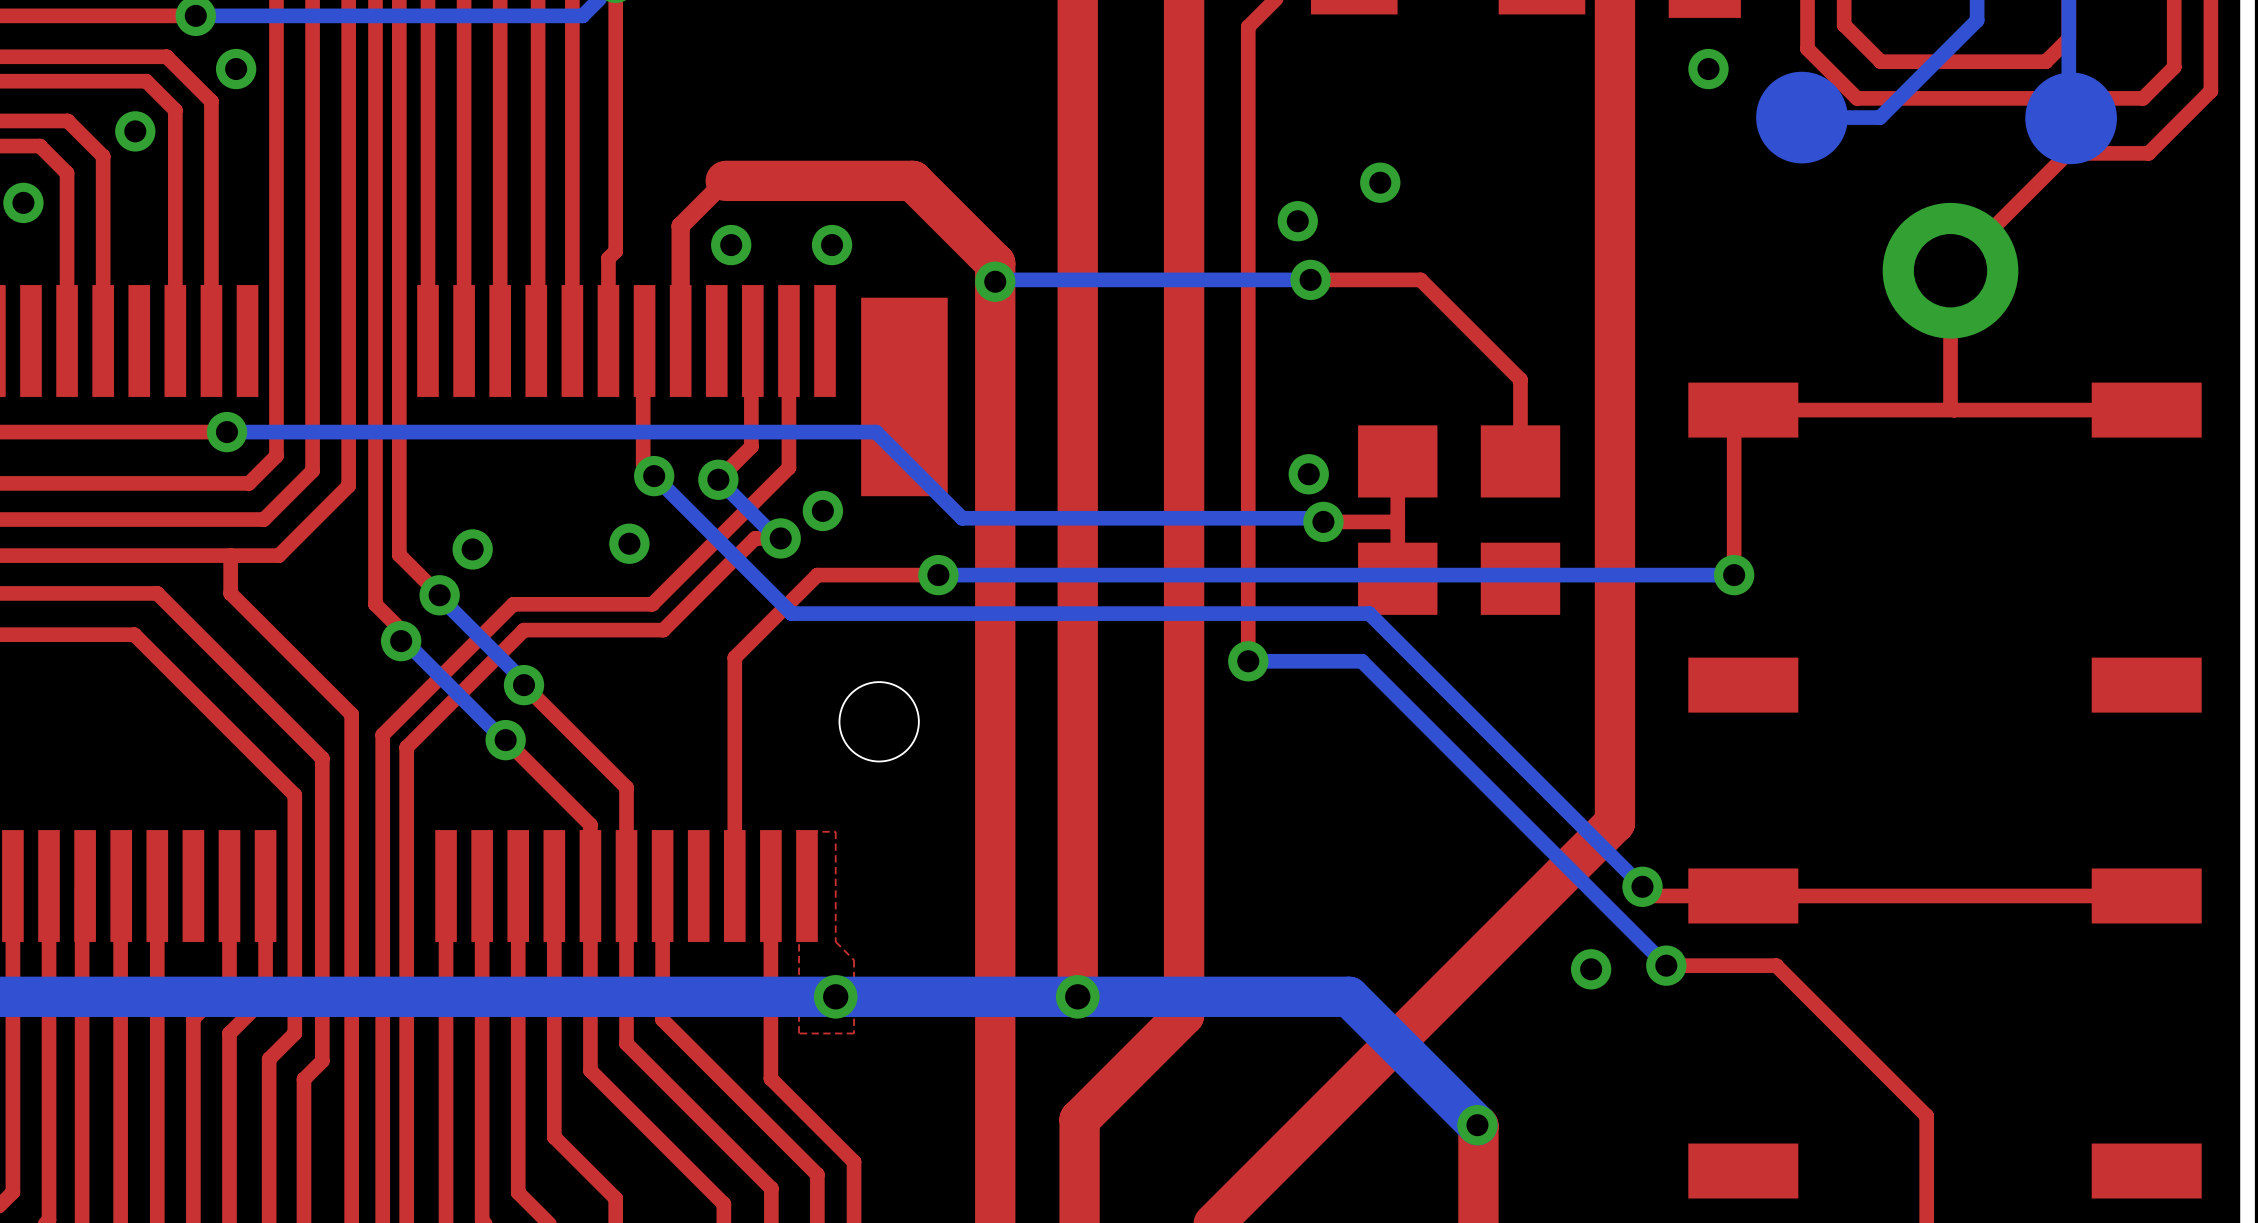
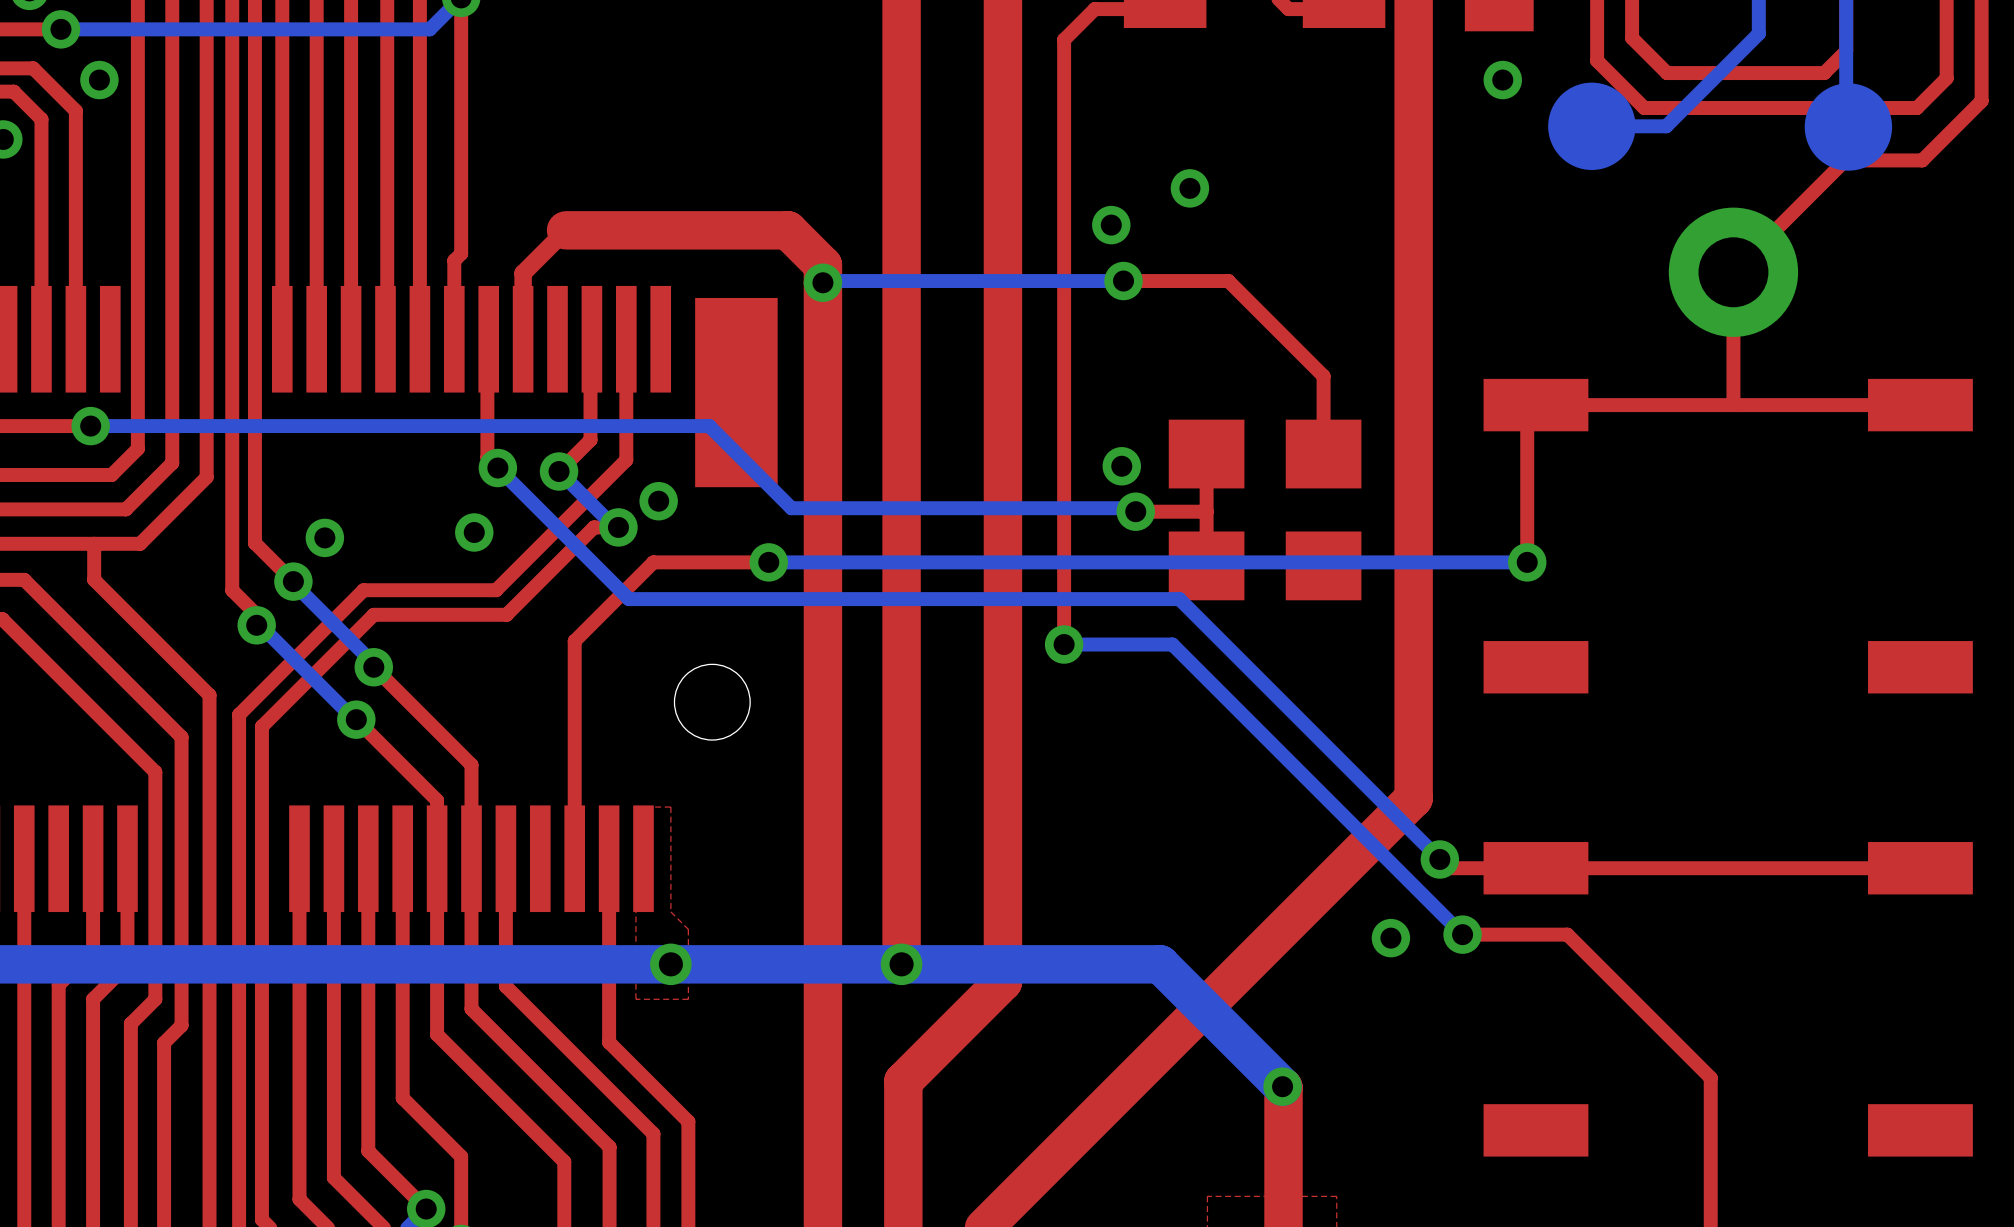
top track: (958, 226) (912, 180) (725, 180) (680, 225) (680, 271) -> (787, 230) (566, 230) (523, 273)
via: (731, 245) -> none
via: (832, 245) -> none

